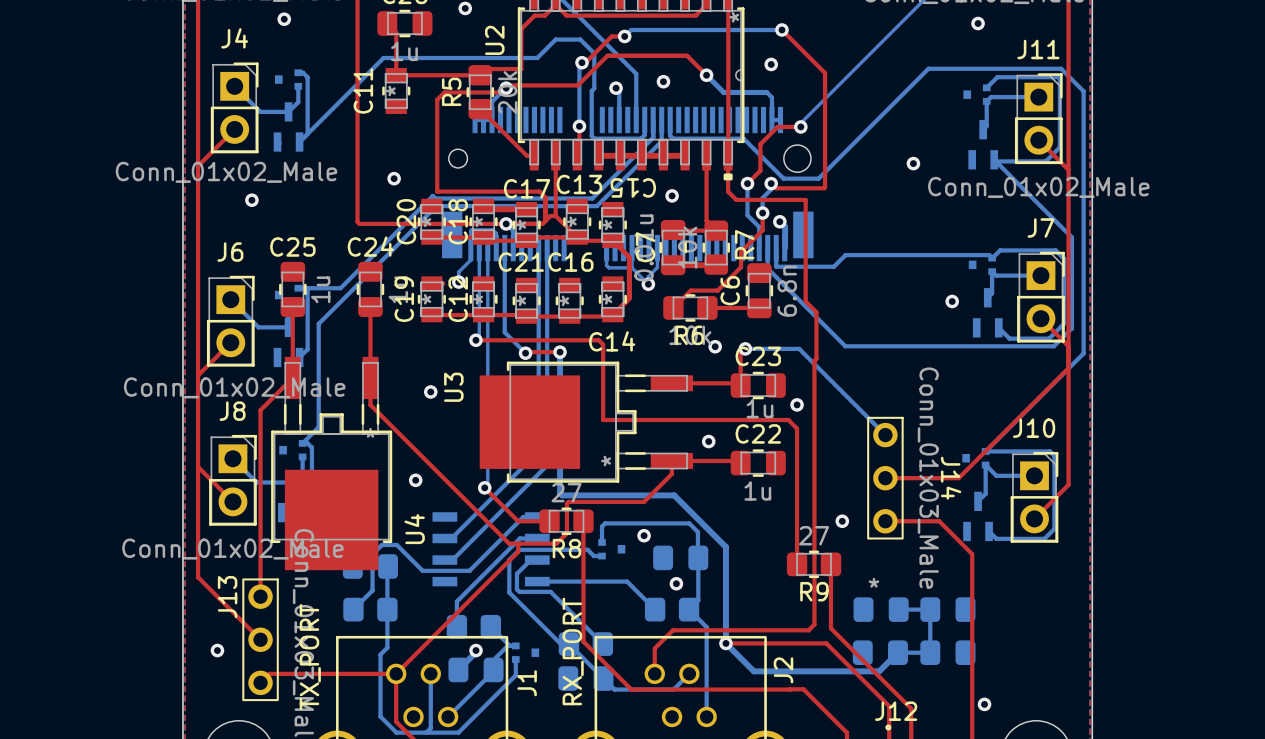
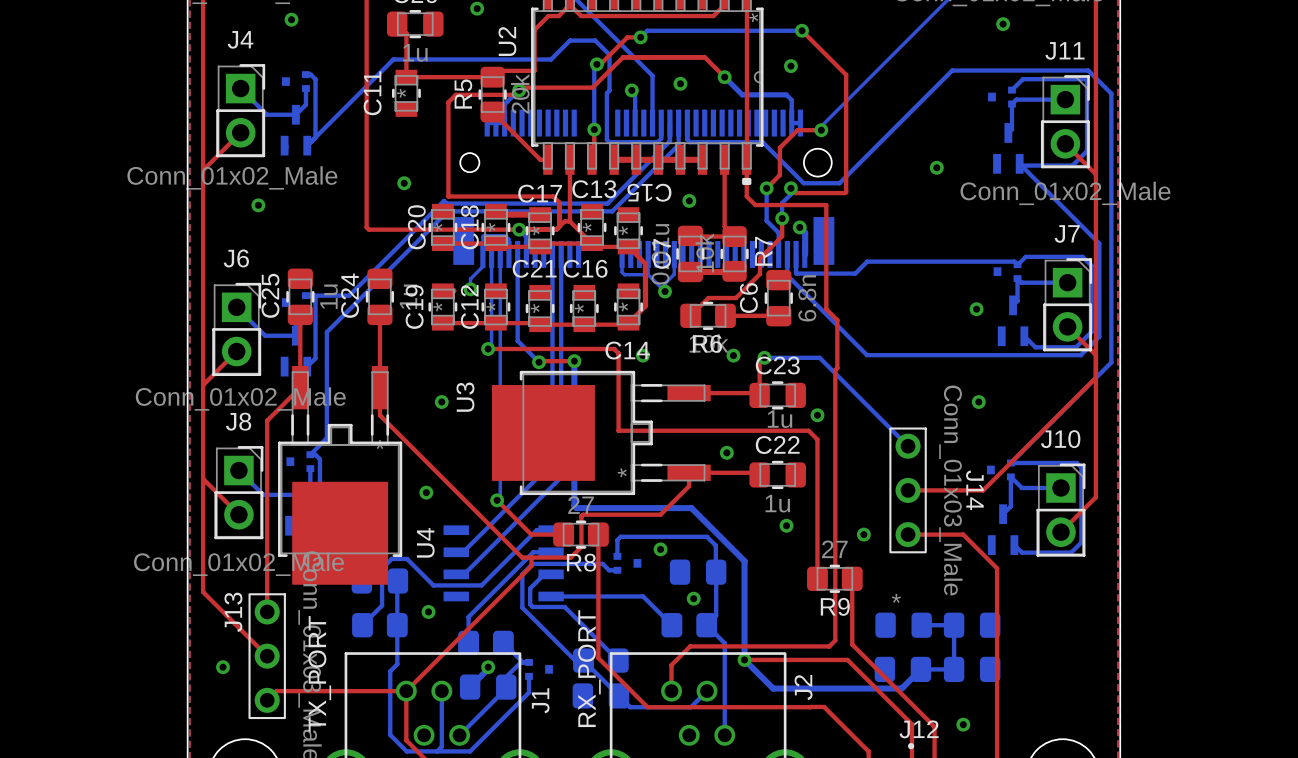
C25 name rotation: 0° (292, 246) -> 90° counterclockwise (270, 295)
C24 name rotation: 0° (370, 246) -> 90° counterclockwise (350, 295)
via: none -> (642, 355)
via: none -> (978, 402)
via: none -> (786, 525)
via: none -> (428, 611)
via position: (984, 704) -> (963, 724)

